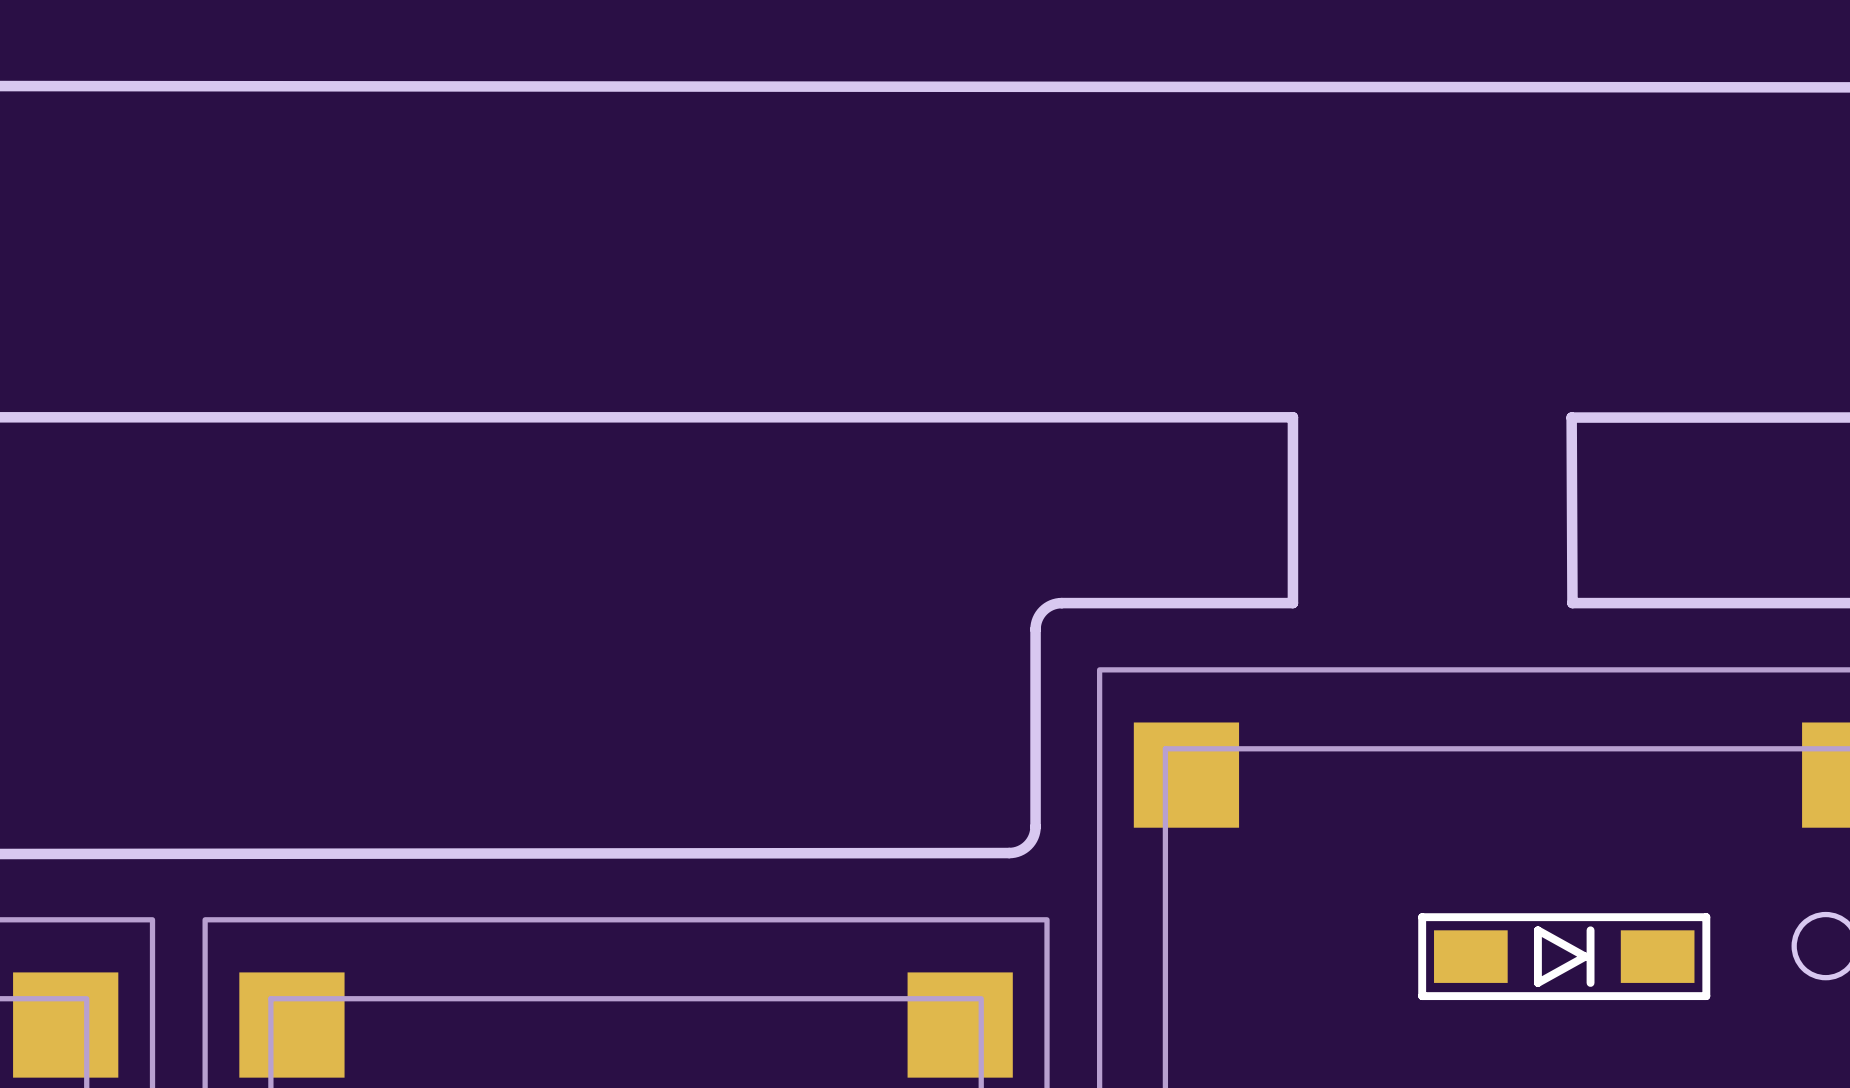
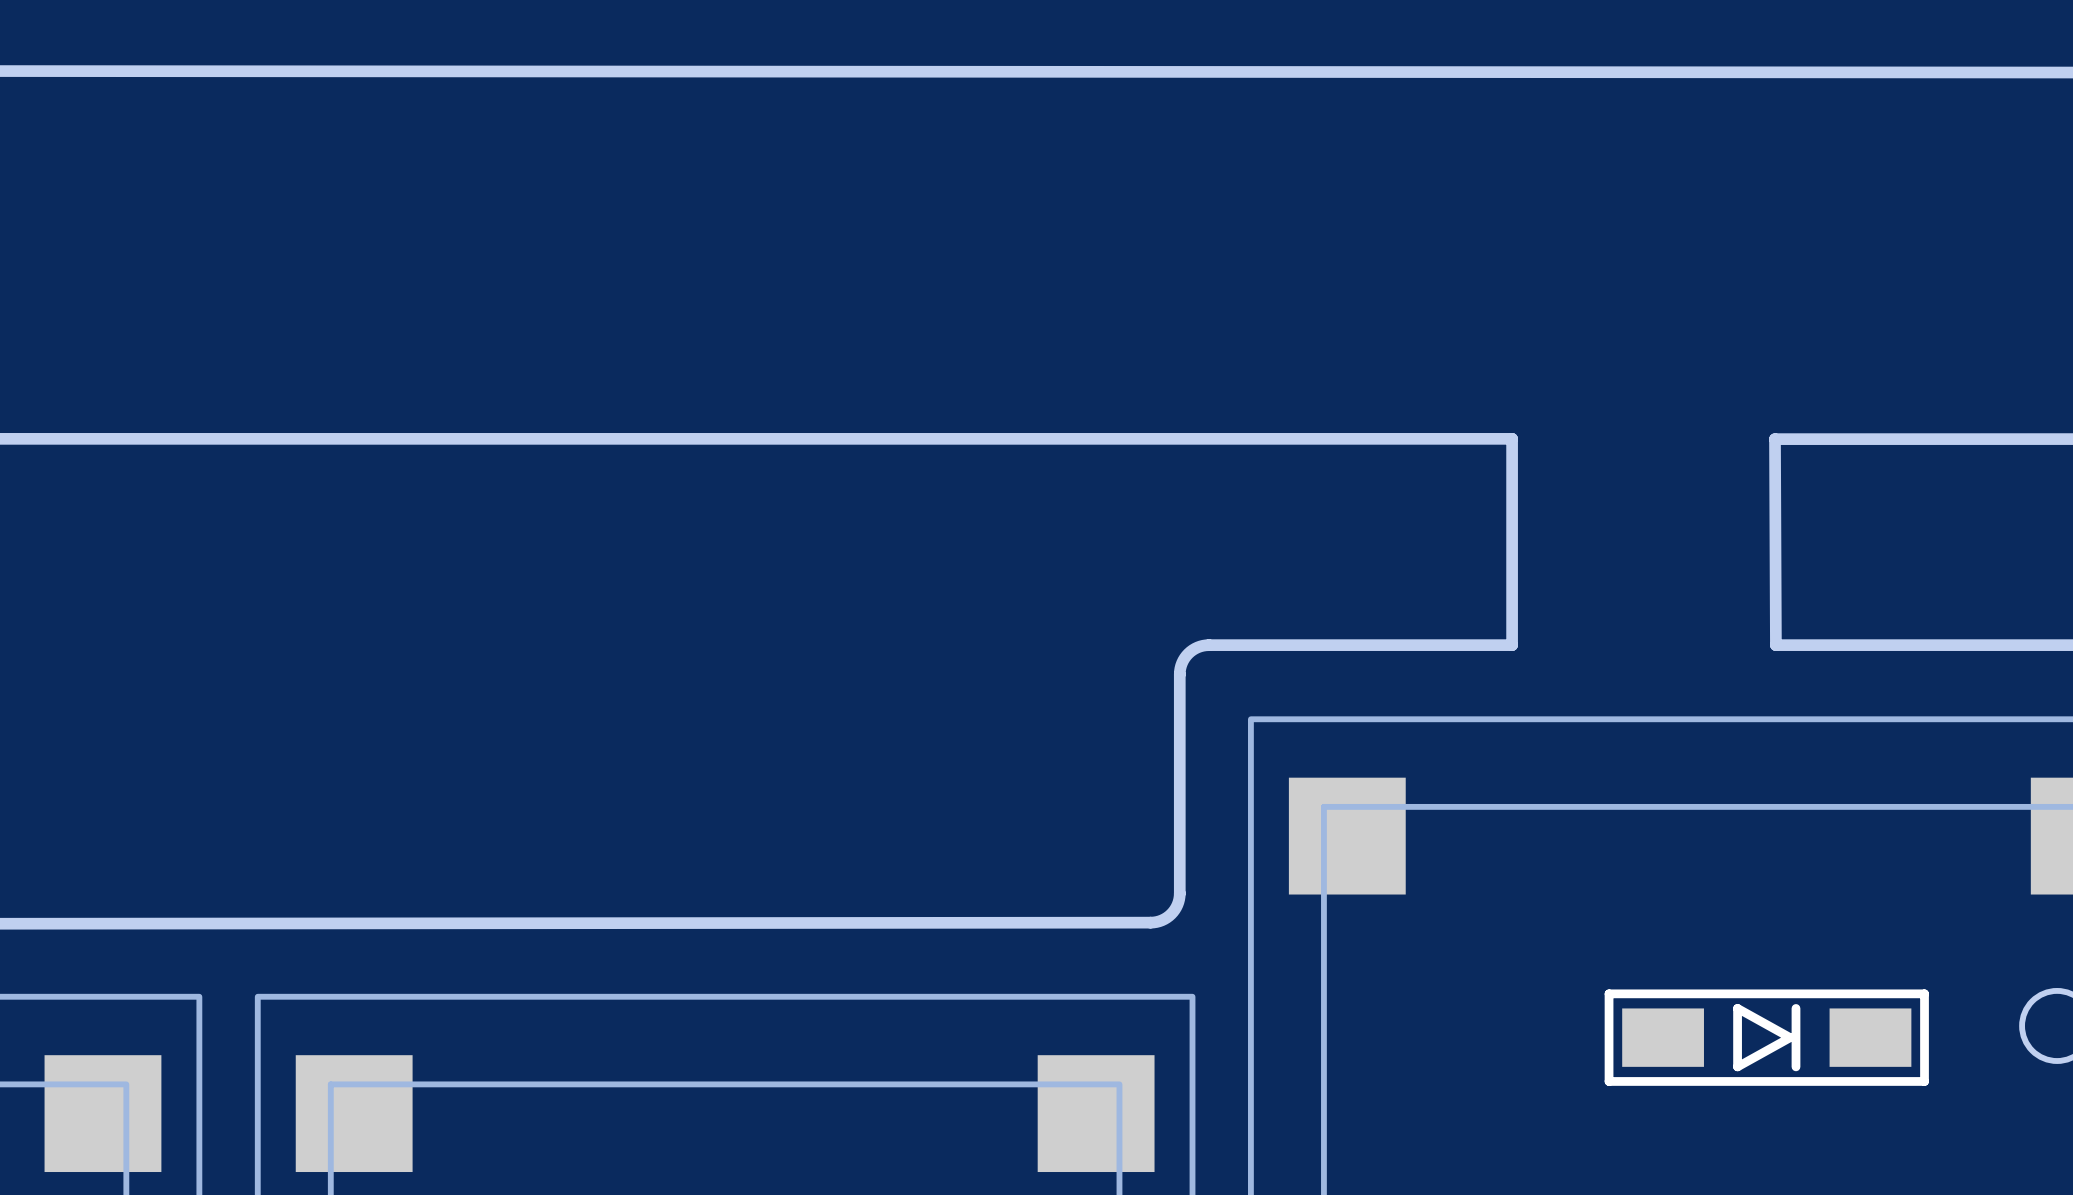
board edge: (1292, 417) (1292, 603) -> (1465, 438) (1512, 438) (1512, 645) (1465, 645)

